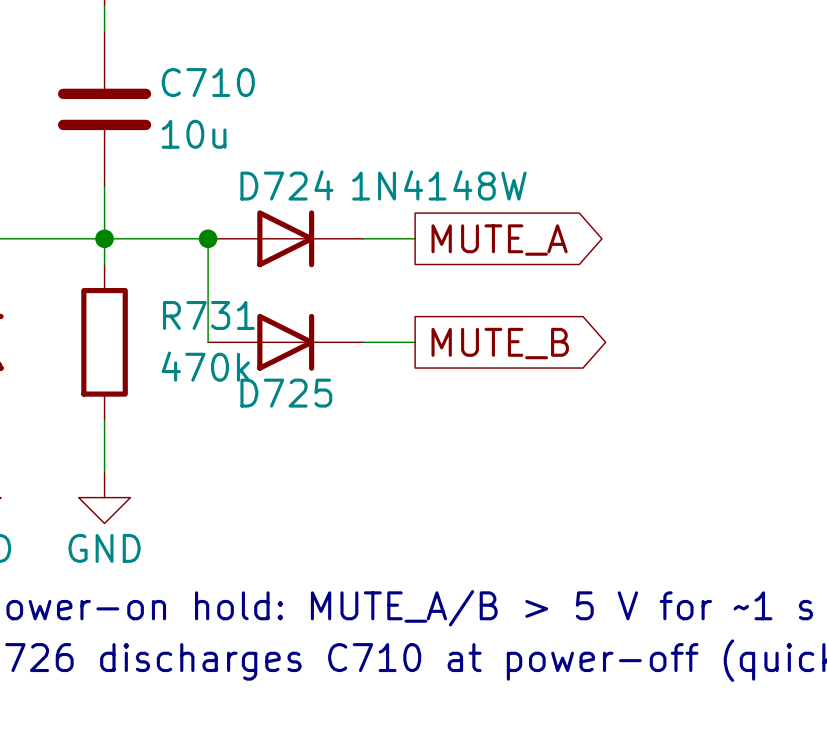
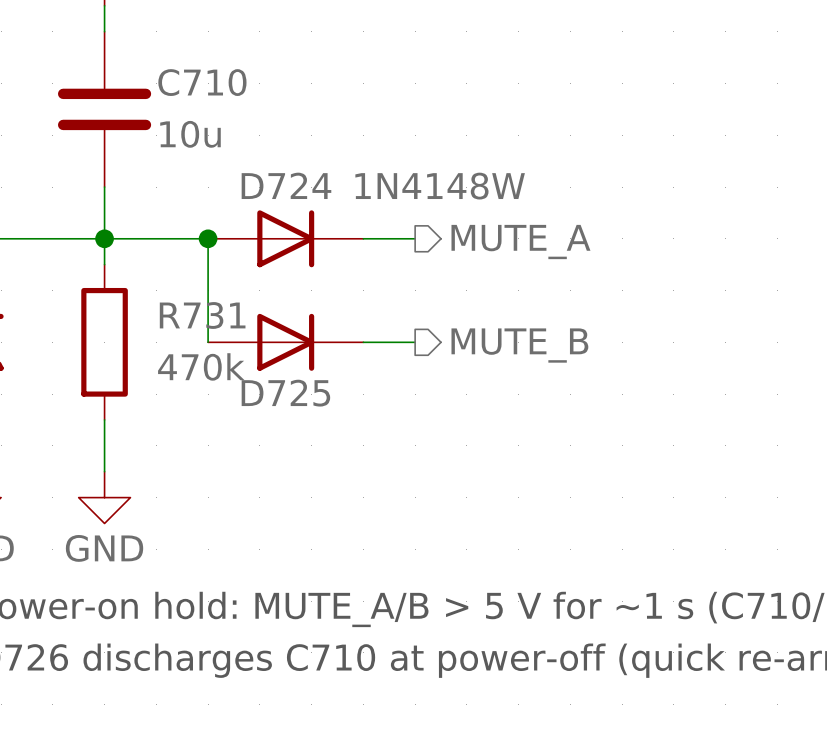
hierarchical label: none -> MUTE_A (520, 242)
global label: MUTE_A (499, 240) -> none
hierarchical label: none -> MUTE_B (519, 345)
global label: MUTE_B (500, 343) -> none

